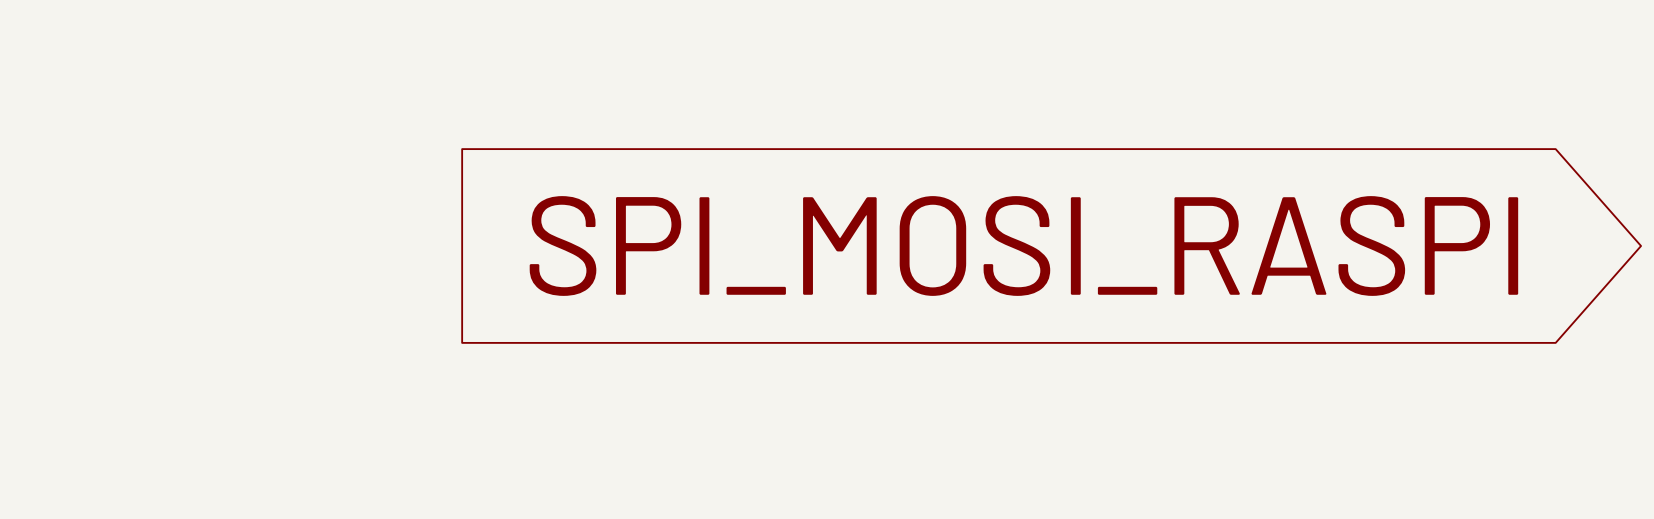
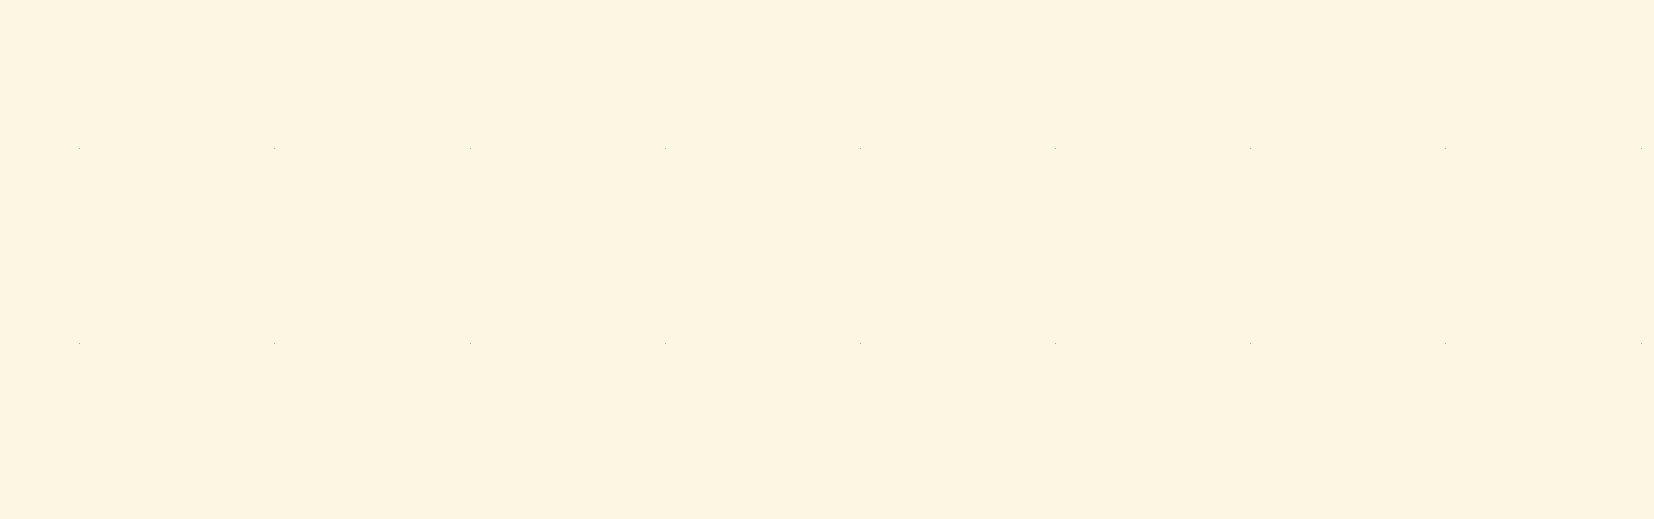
global label: SPI_MOSI_RASPI (1023, 246) -> none

